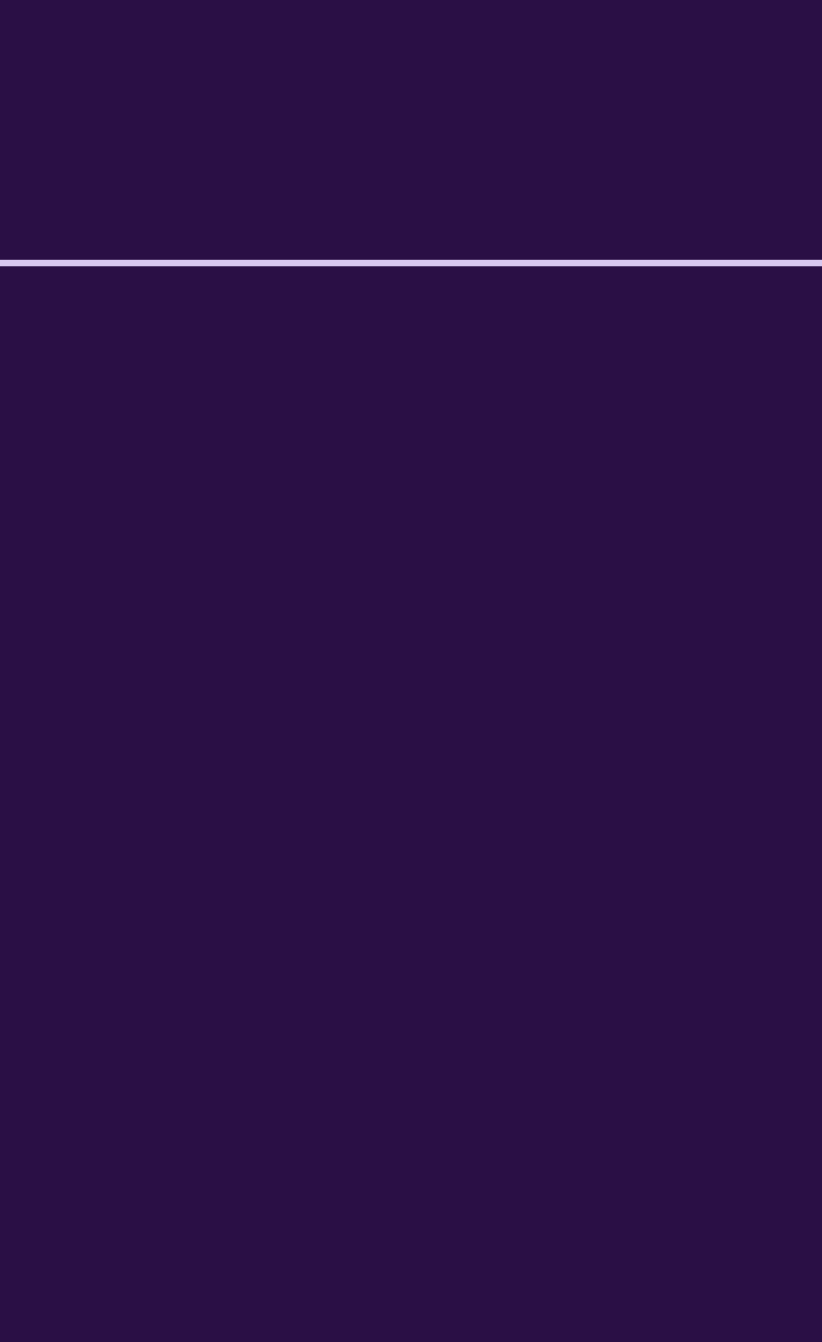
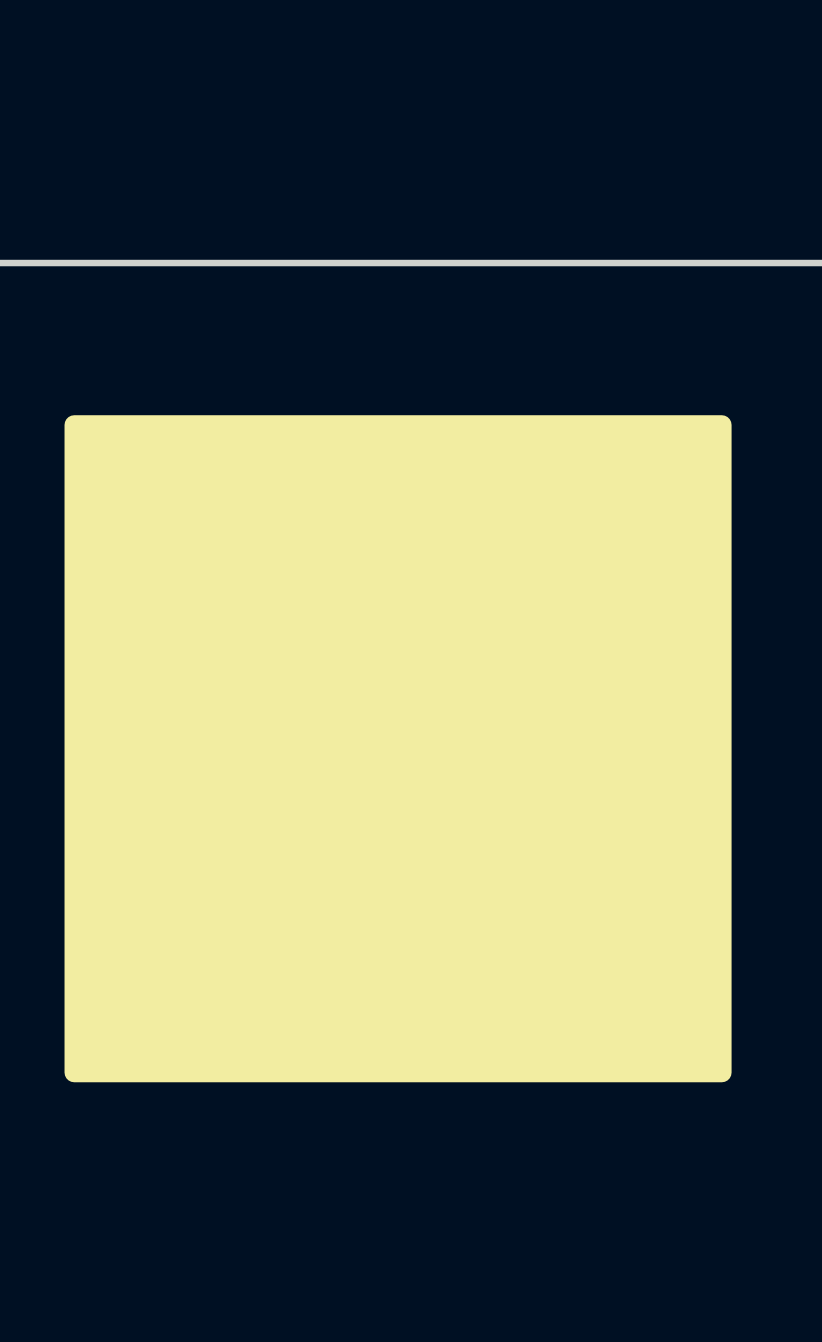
drawing: none -> [64, 415, 732, 1083]

